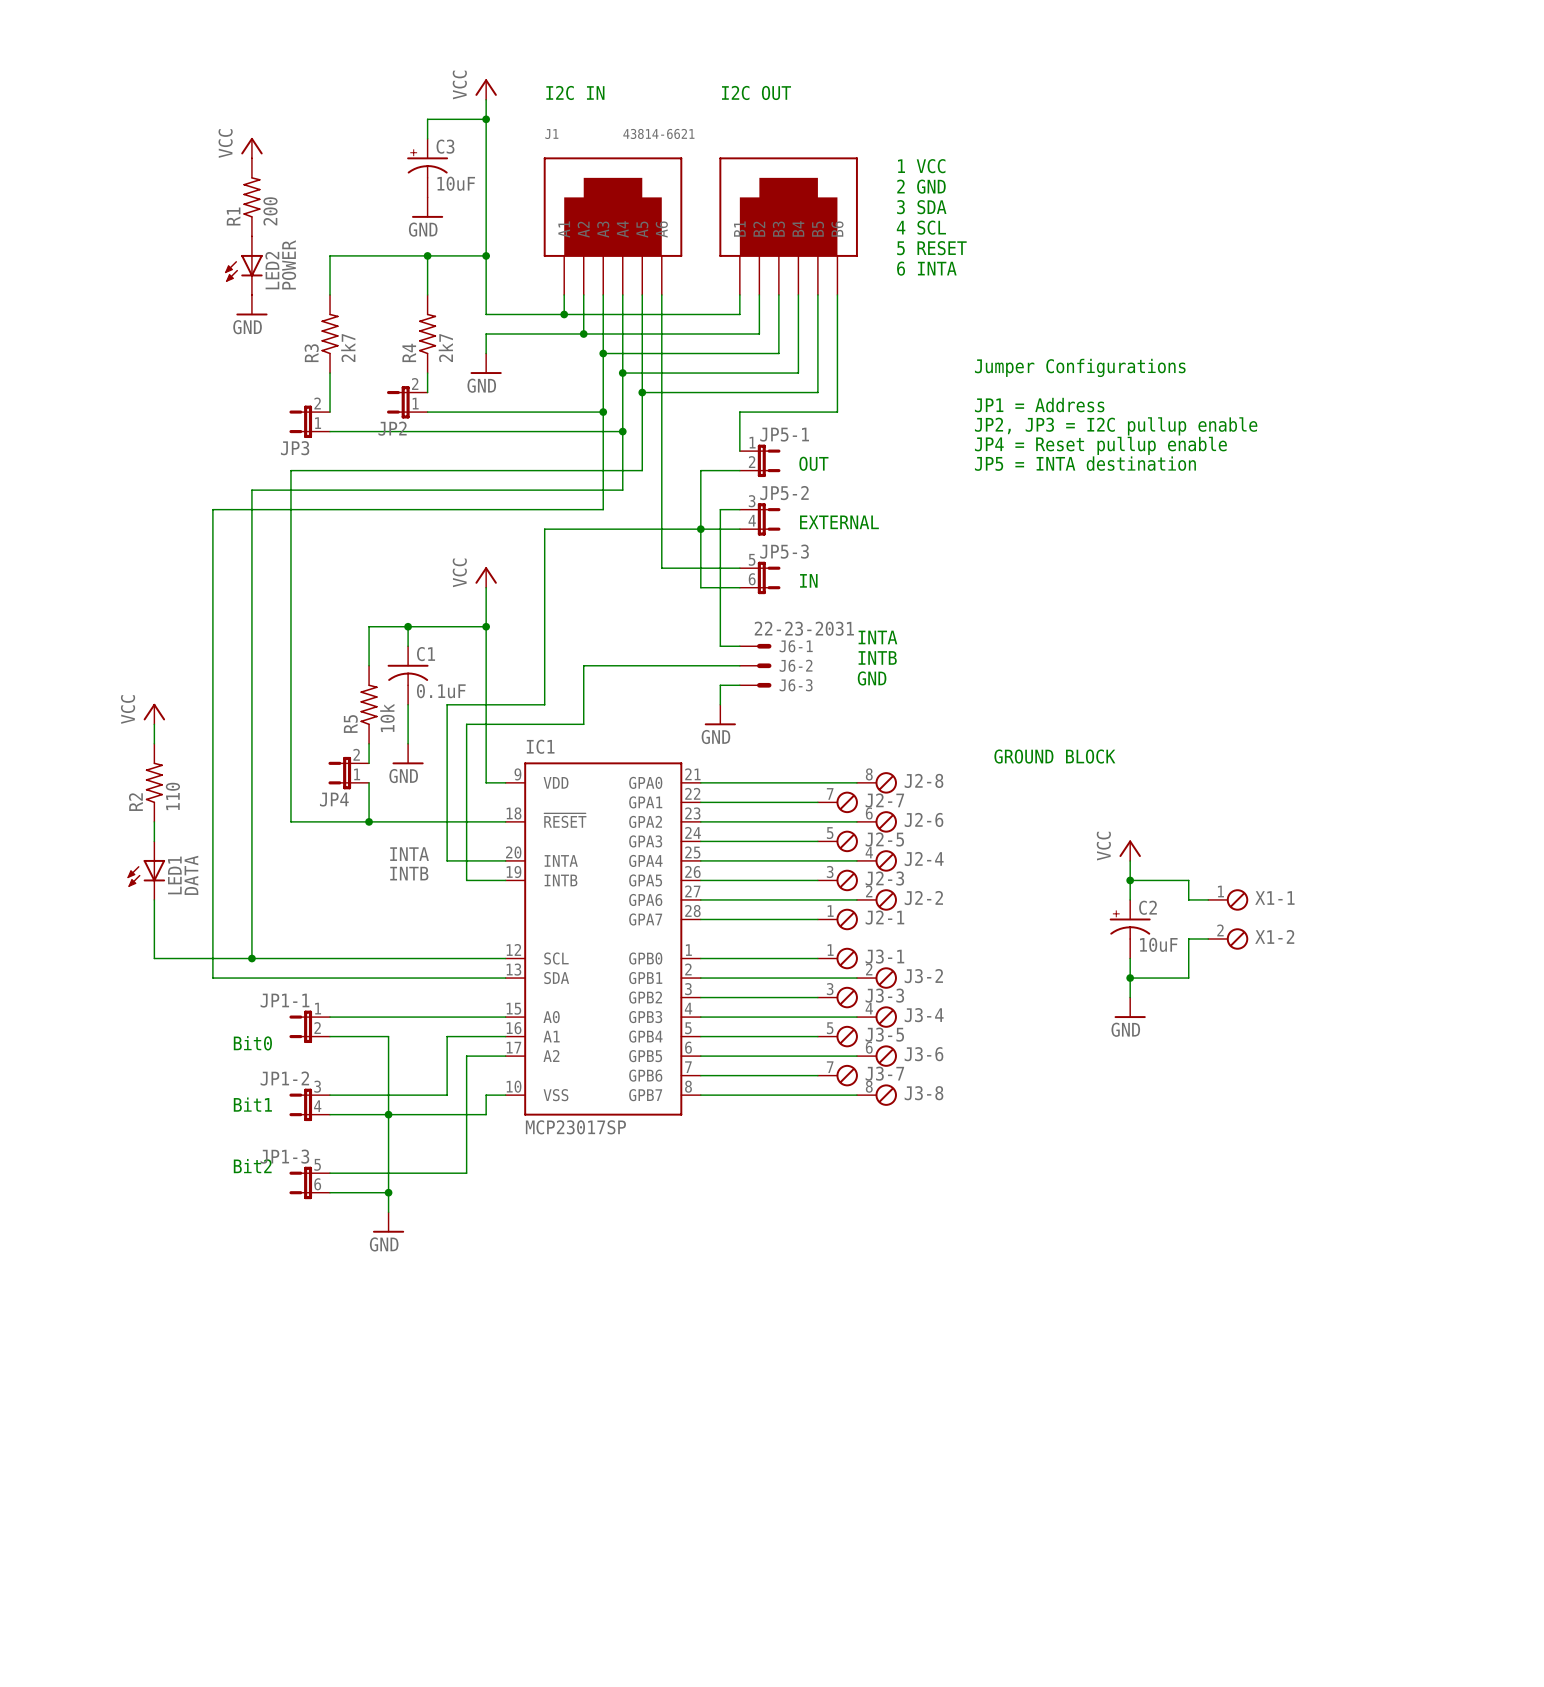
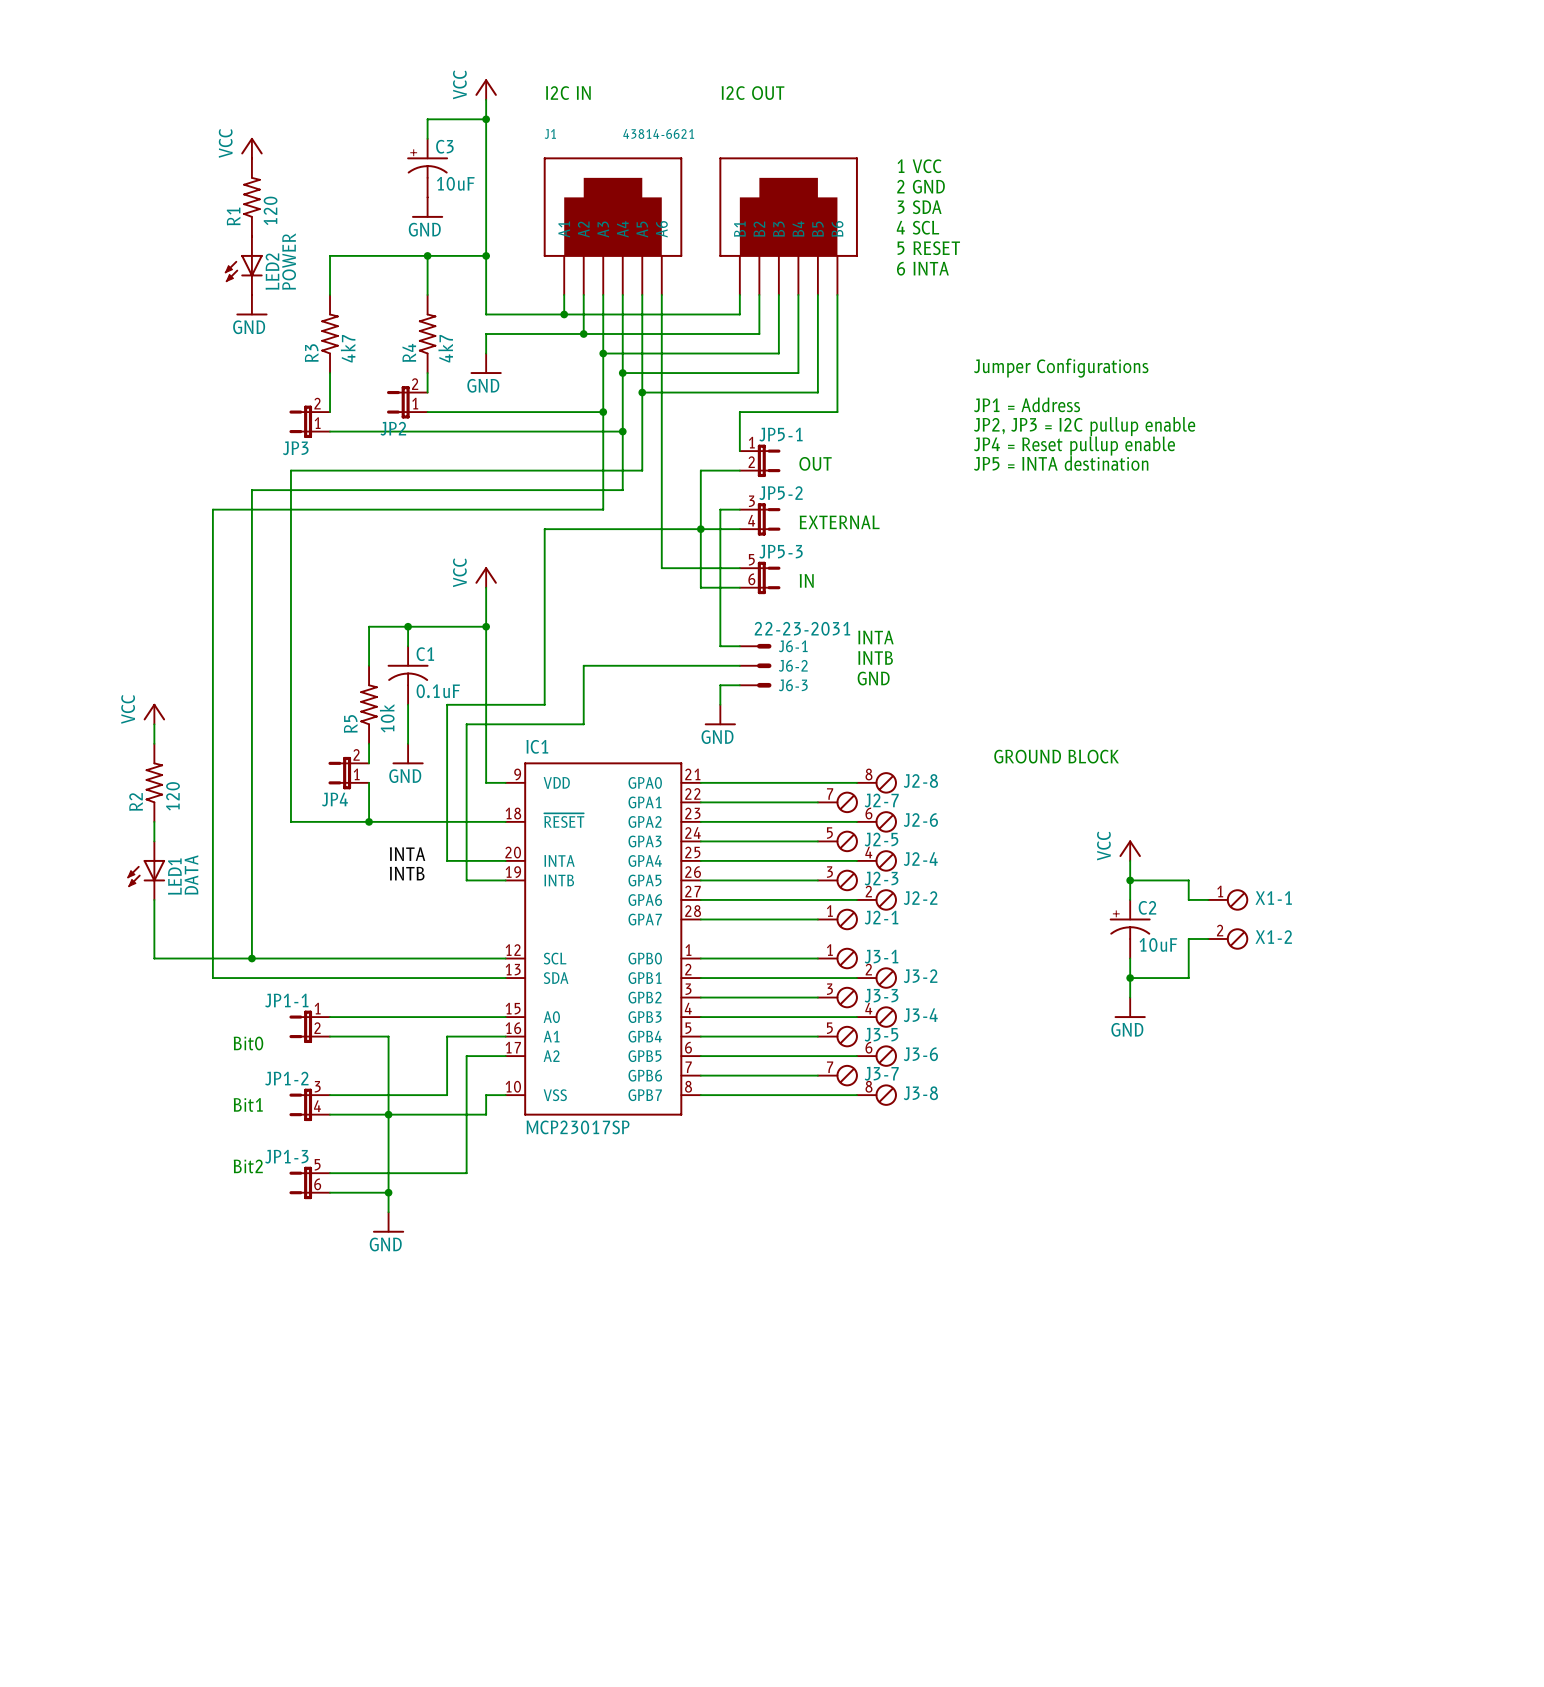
R1 value: 200 (270, 211) -> 120 (270, 210)
R3 value: 2k7 (348, 348) -> 4k7 (348, 348)
R4 value: 2k7 (445, 348) -> 4k7 (445, 348)
R2 value: 110 (172, 796) -> 120 (172, 796)

